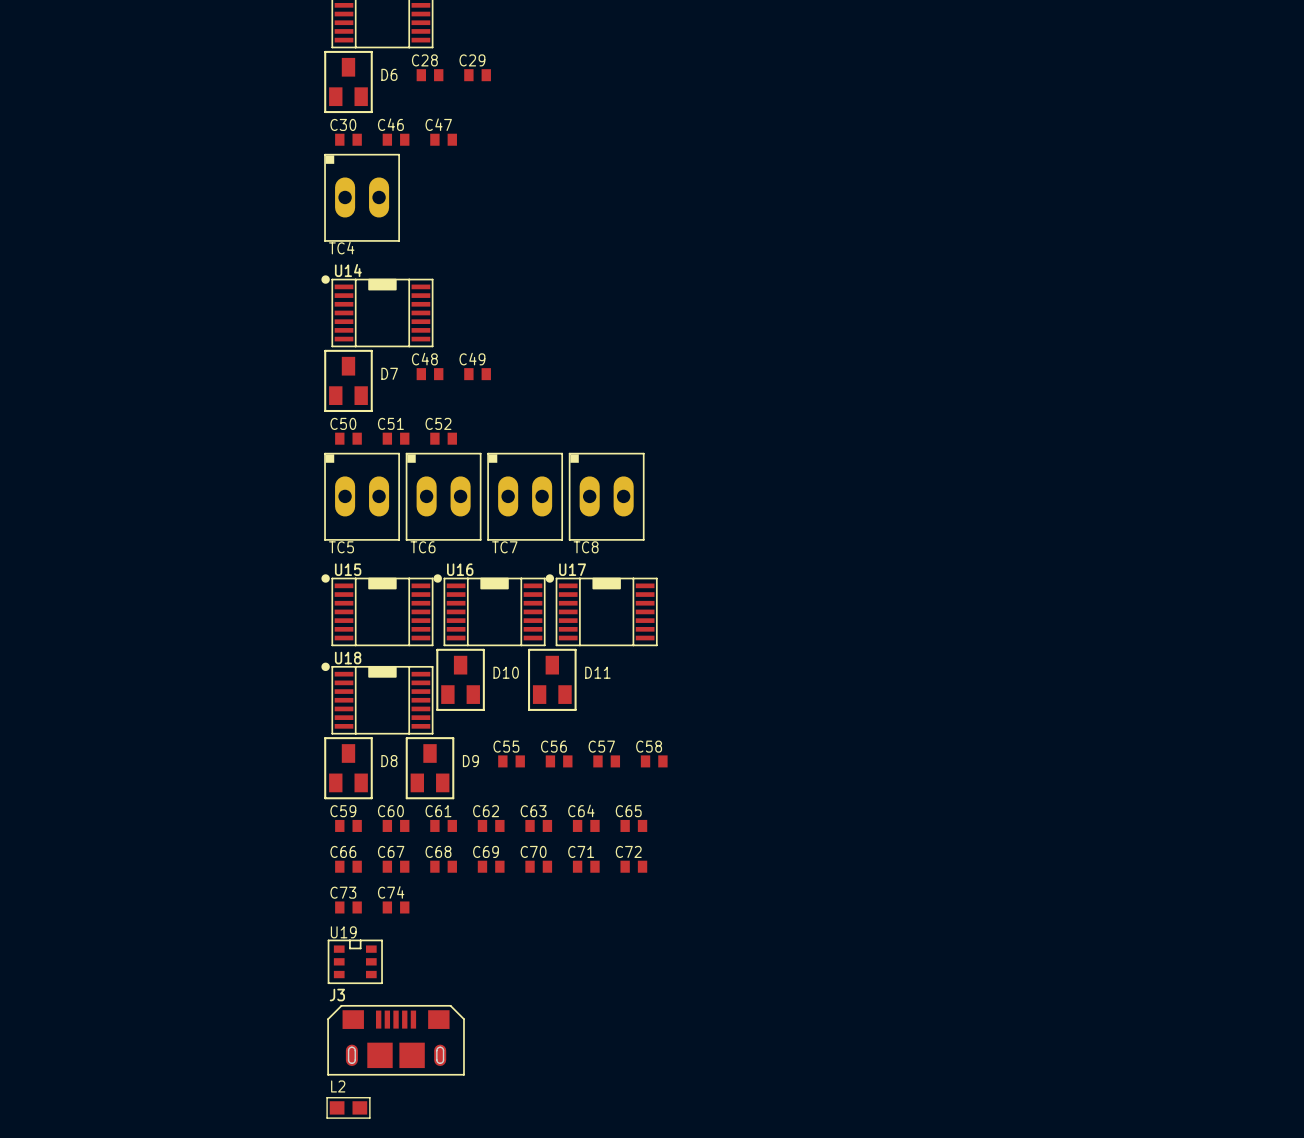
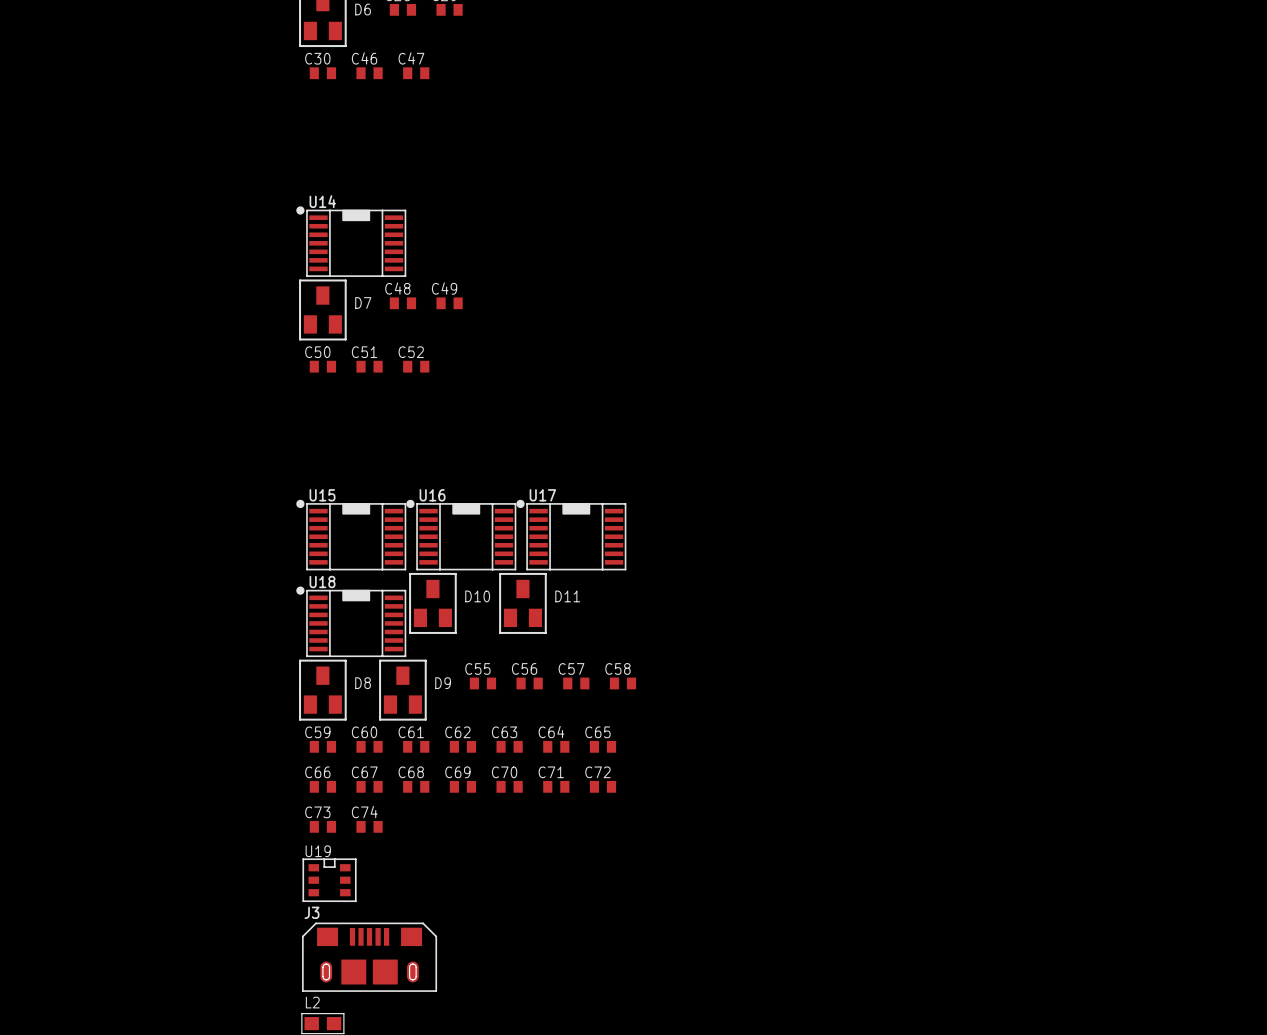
TC4: (362, 197) -> none
TC5: (362, 496) -> none
TC6: (443, 496) -> none
TC7: (525, 496) -> none
TC8: (606, 496) -> none

